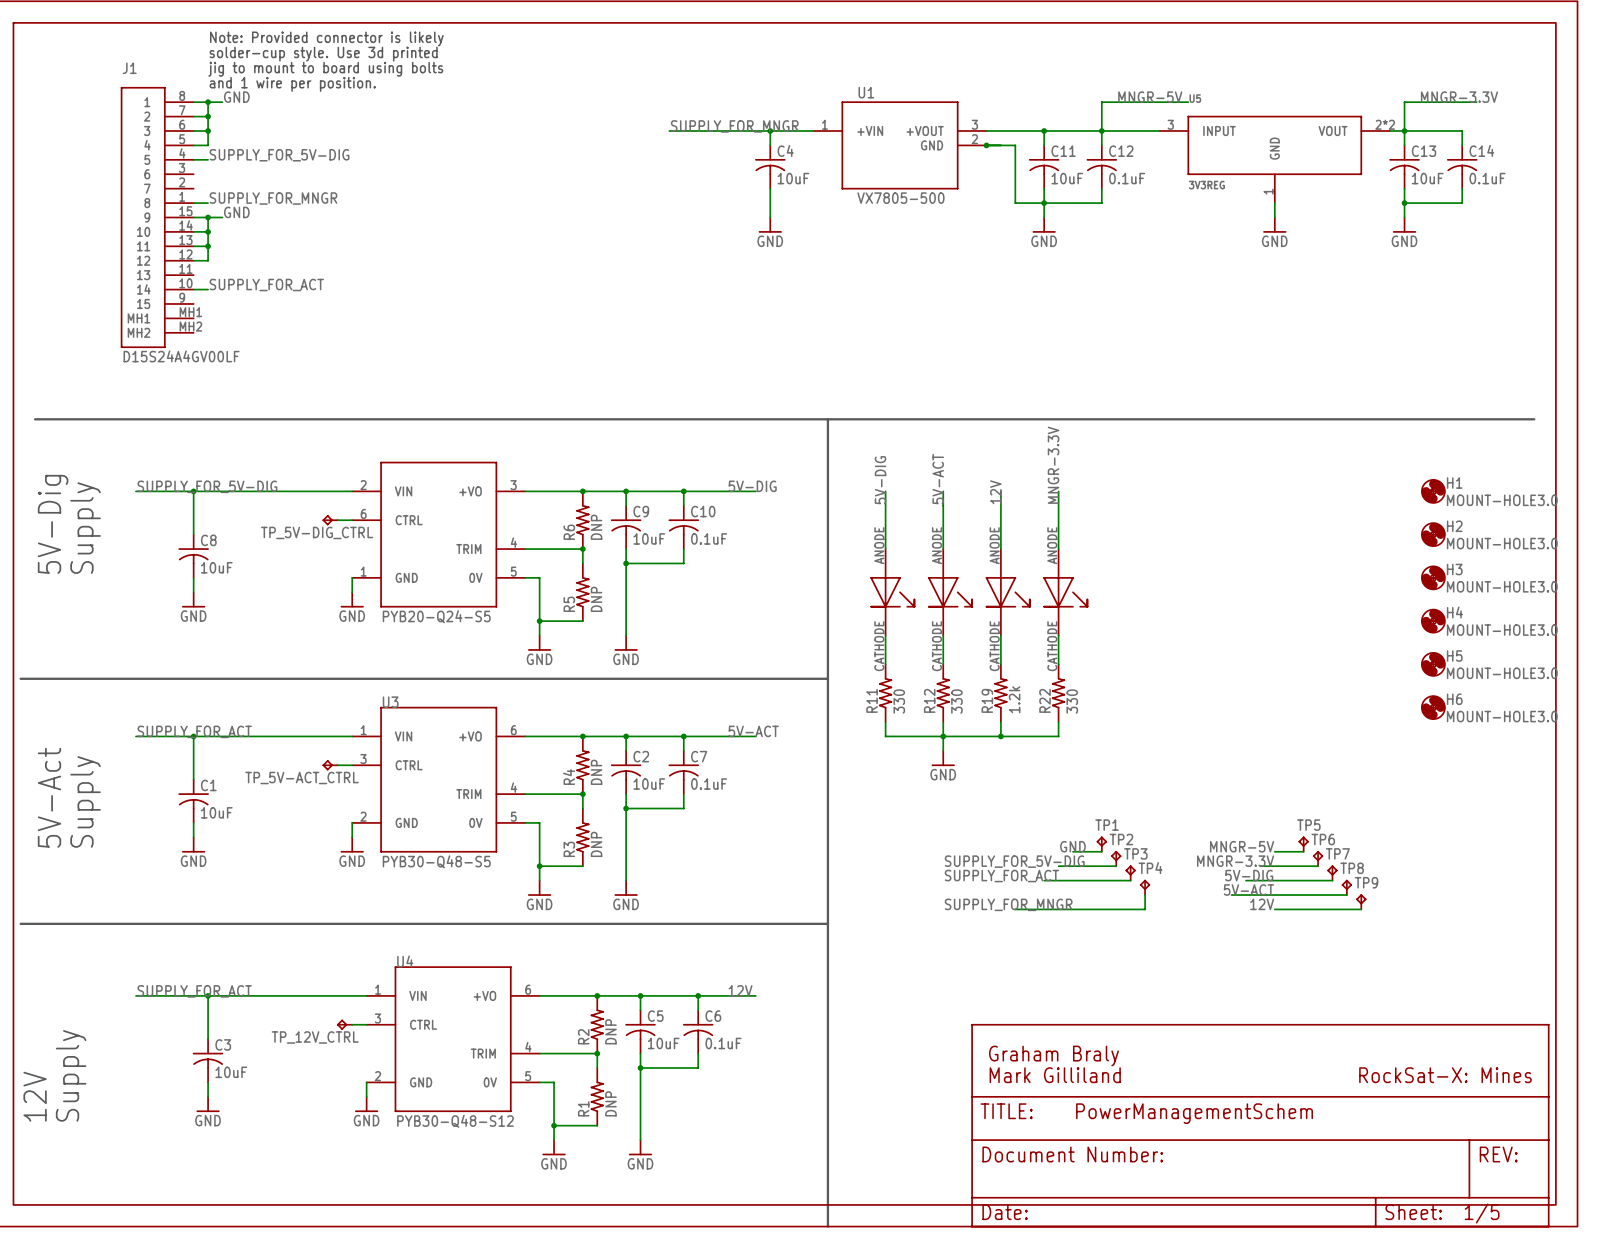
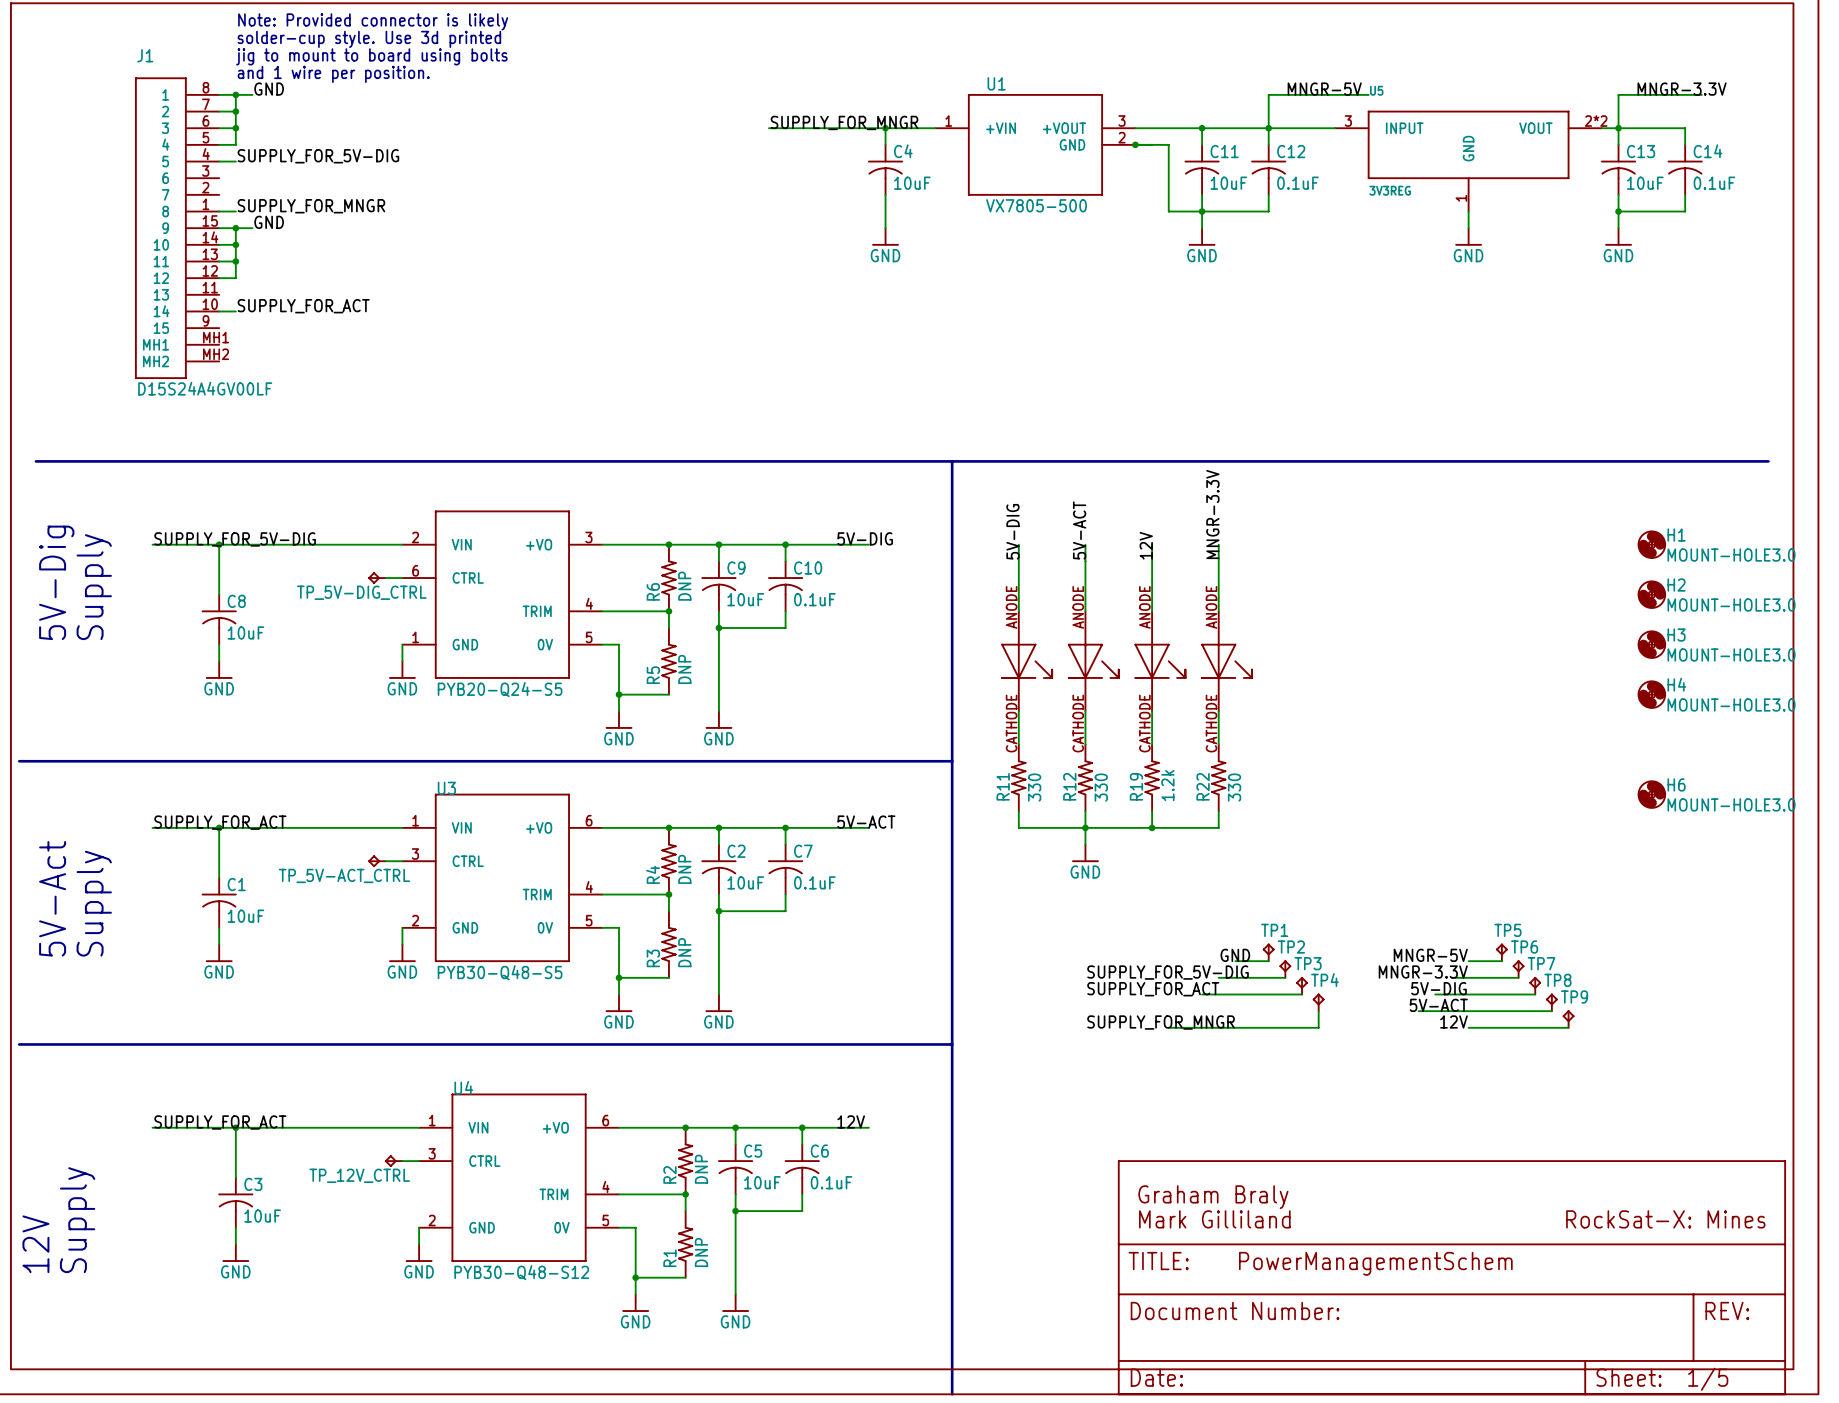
H5: MOUNT-HOLE3.0 (1433, 664) -> none

